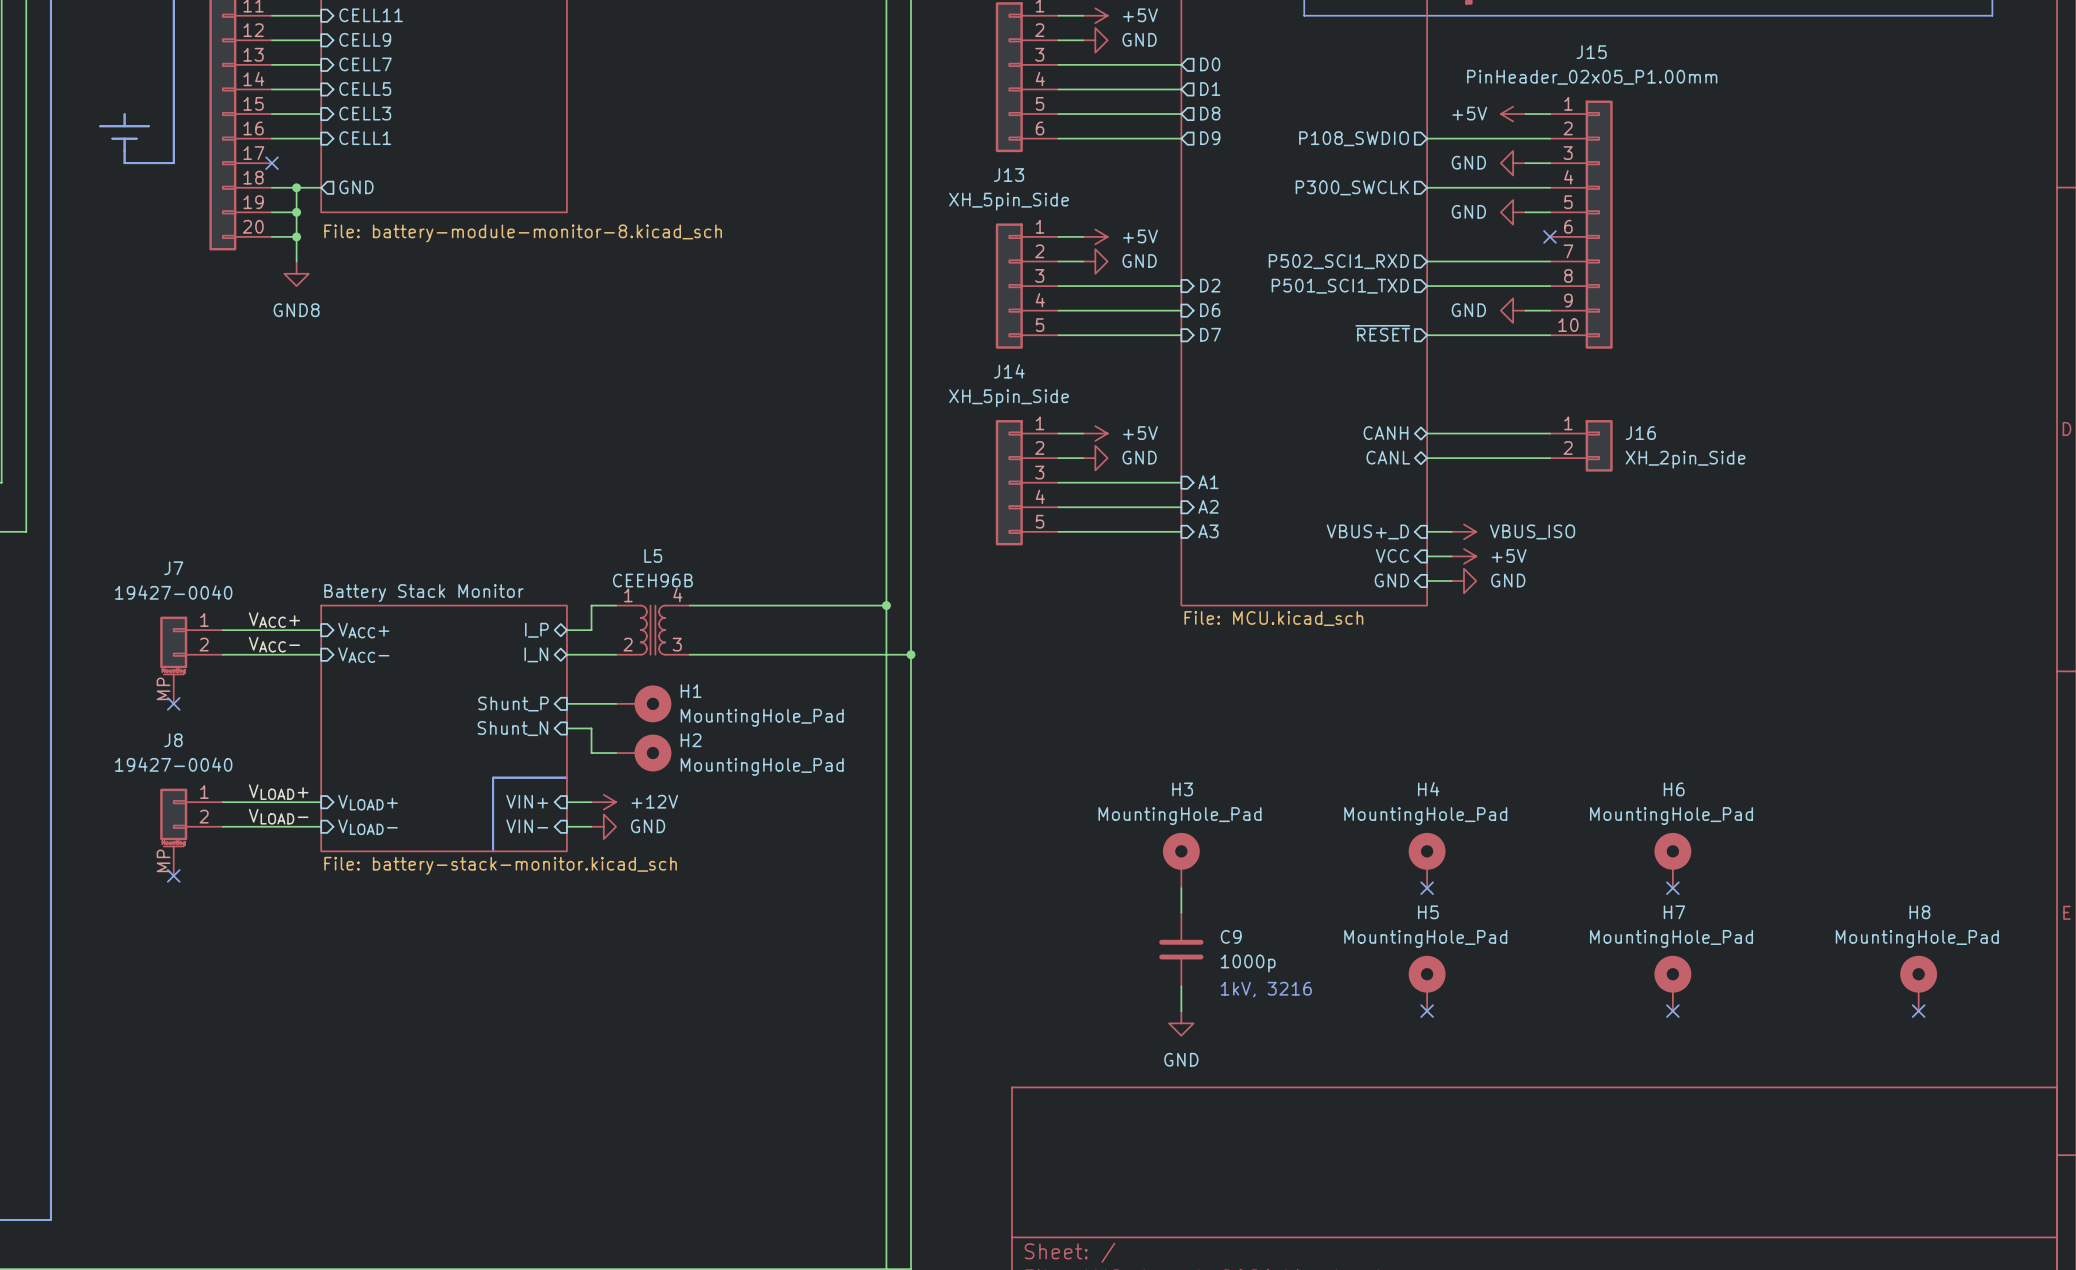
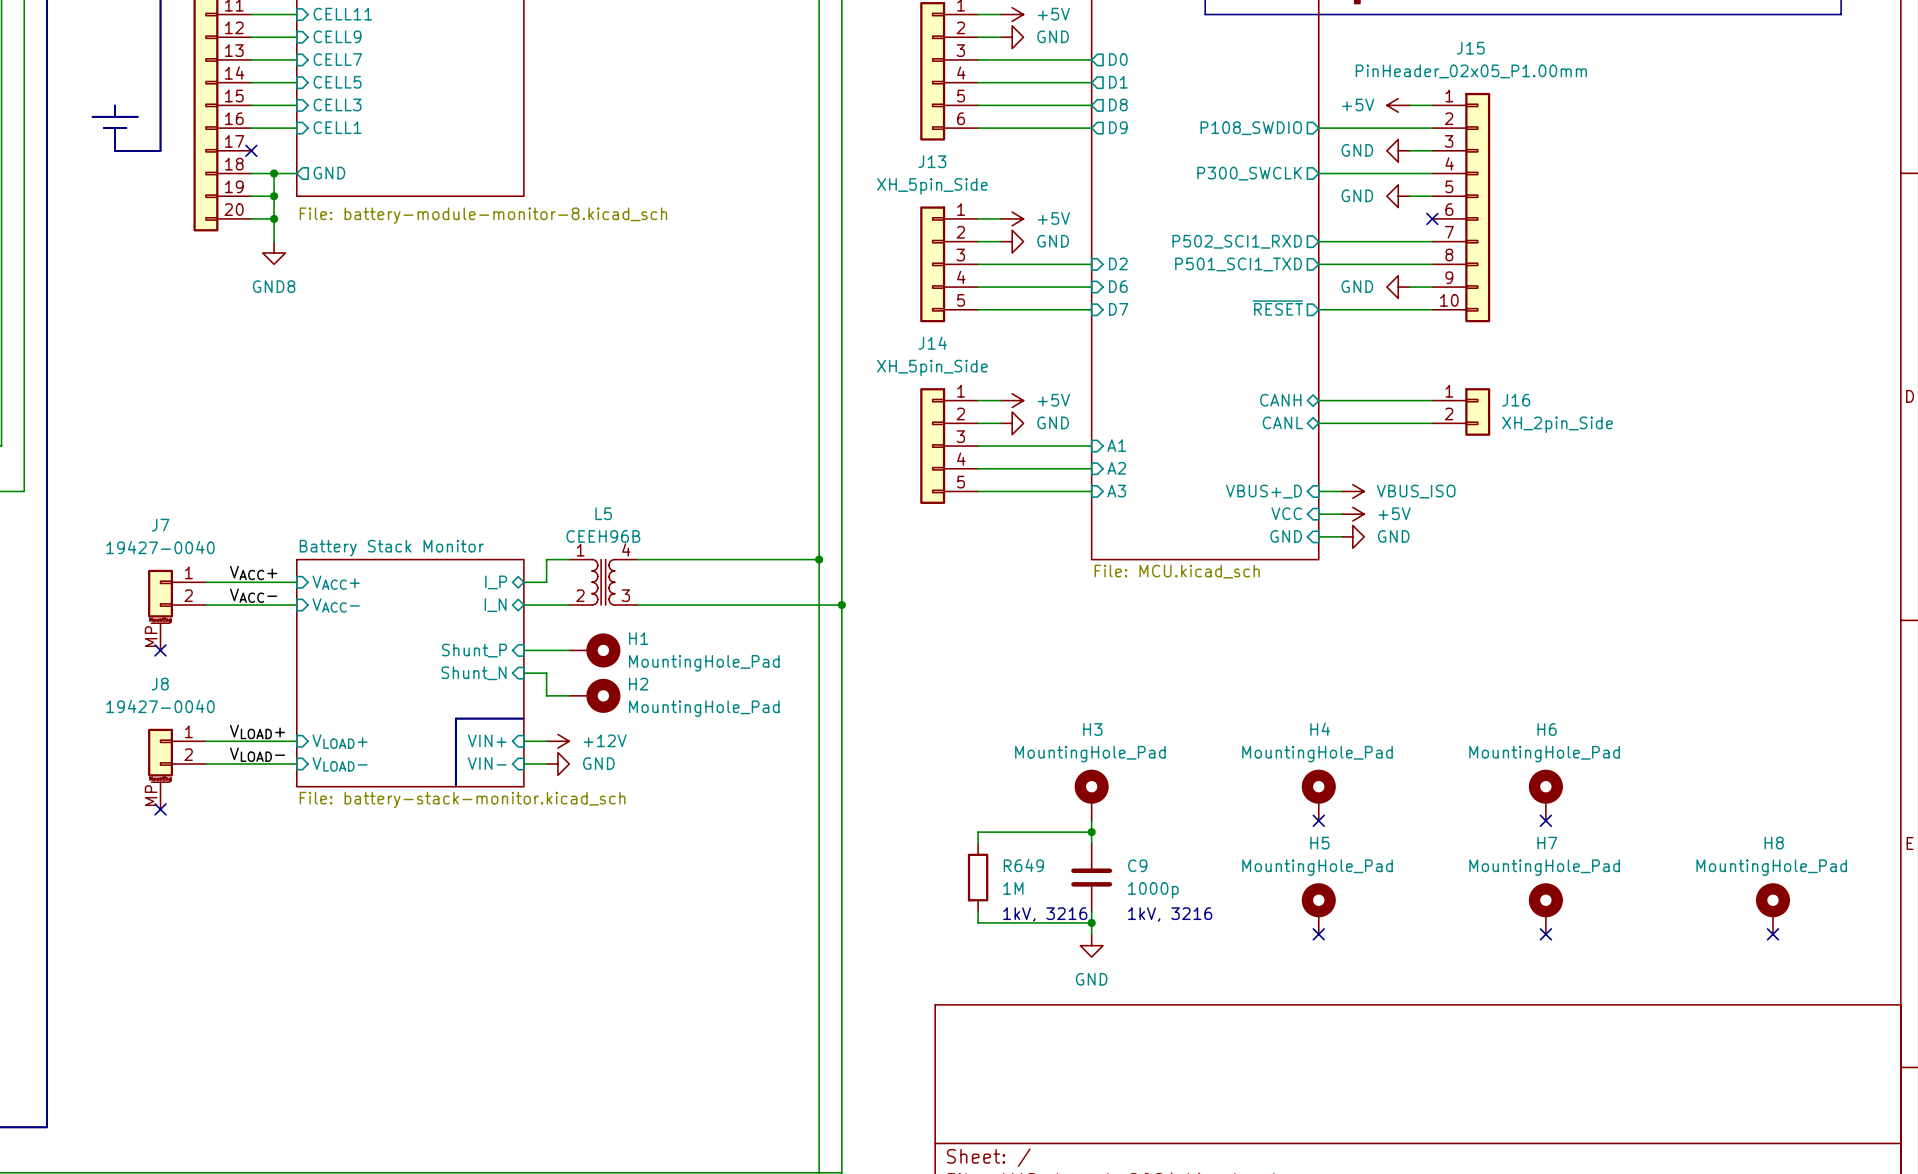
wire: none -> (1091, 832) (978, 832) (978, 843)
junction: none -> (1091, 832)
R649: none -> 1M (978, 877)
wire: none -> (978, 911) (978, 922) (1091, 922)
text: none -> 1kV, 3216 (1045, 914)
junction: none -> (1091, 922)

